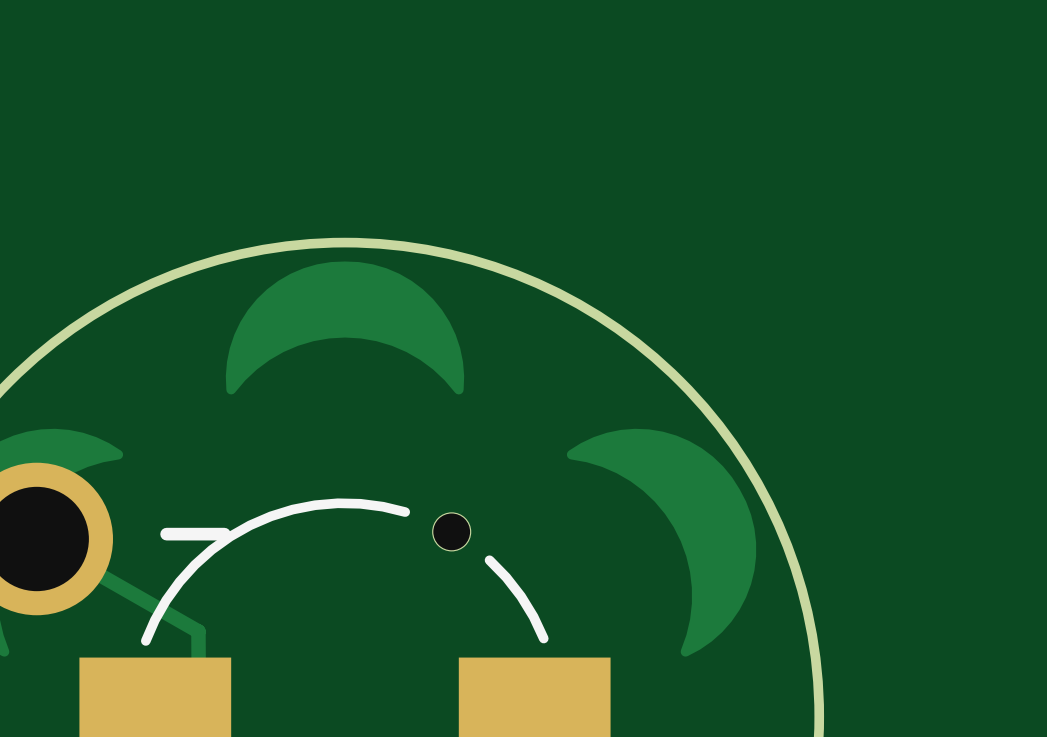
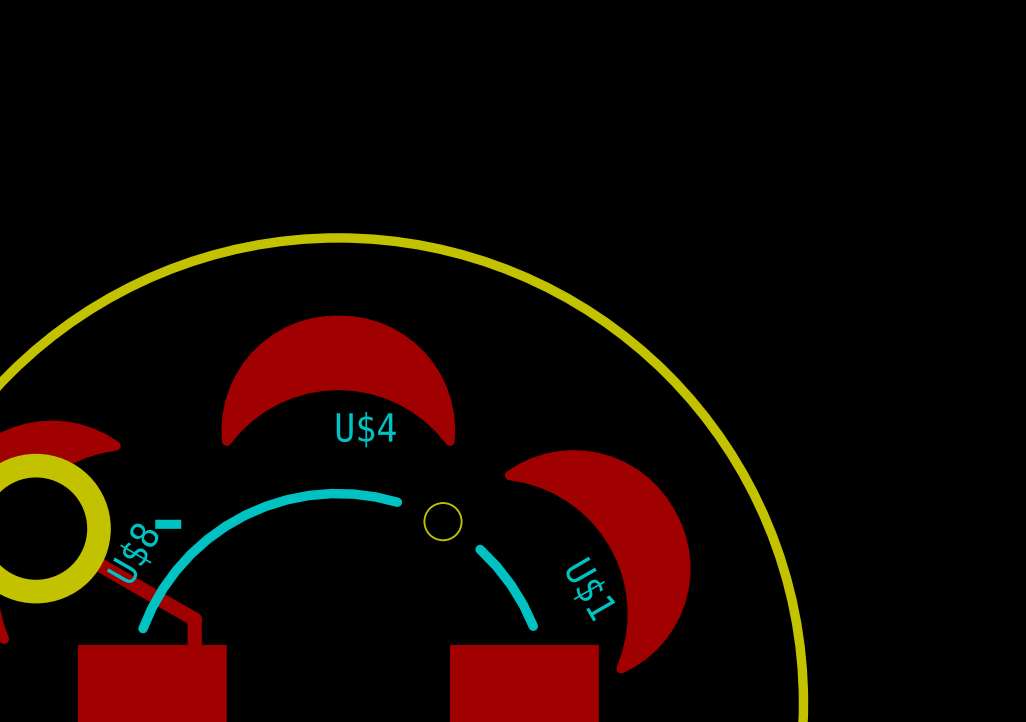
drawing: [225, 261, 465, 395] -> none
U$4: none -> (338, 380)
drawing: [566, 428, 757, 657] -> none
U$8 name: none -> U$8 (132, 553)
U$1: none -> (597, 561)

